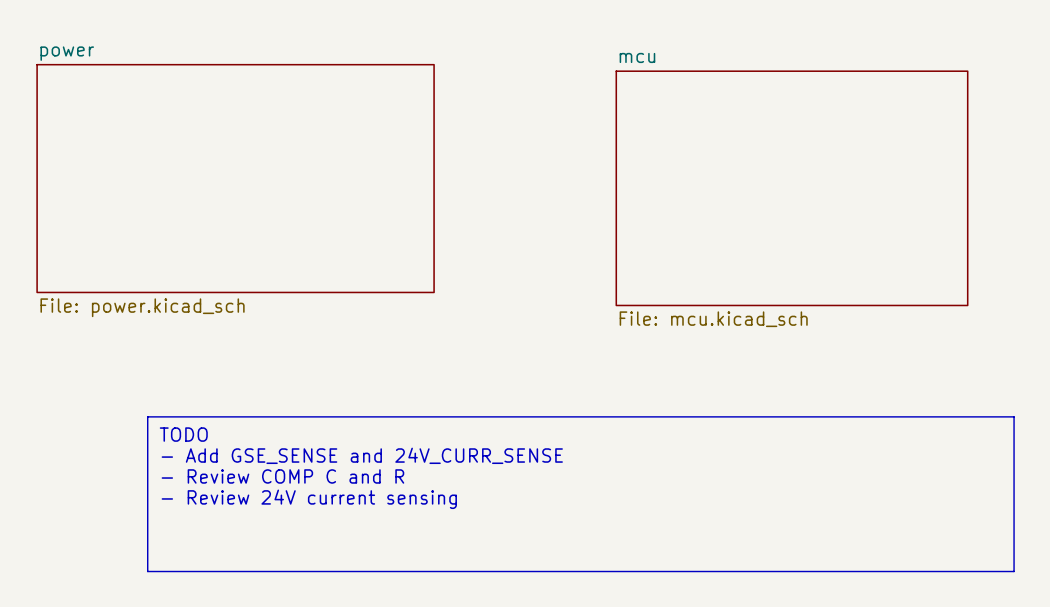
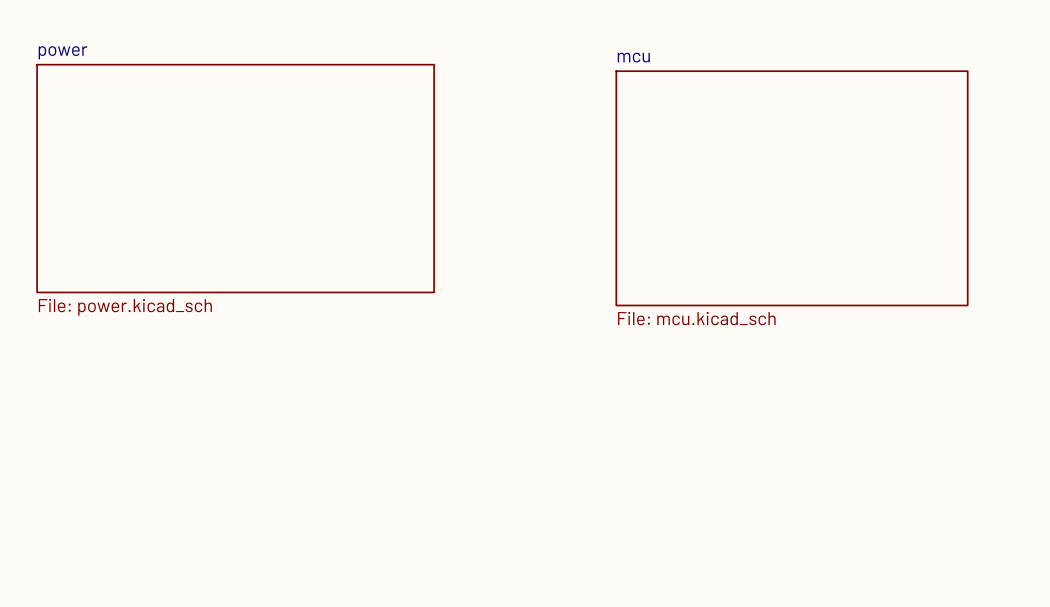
line: (147, 416) (1014, 416) (1014, 571) (147, 571) (147, 416) -> none
text: TODO (183, 434) -> none
text: - Add GSE_SENSE and 24V_CURR_SENSE (362, 455) -> none
text: - Review COMP C and R (282, 476) -> none
text: - Review 24V current sensing (309, 499) -> none

